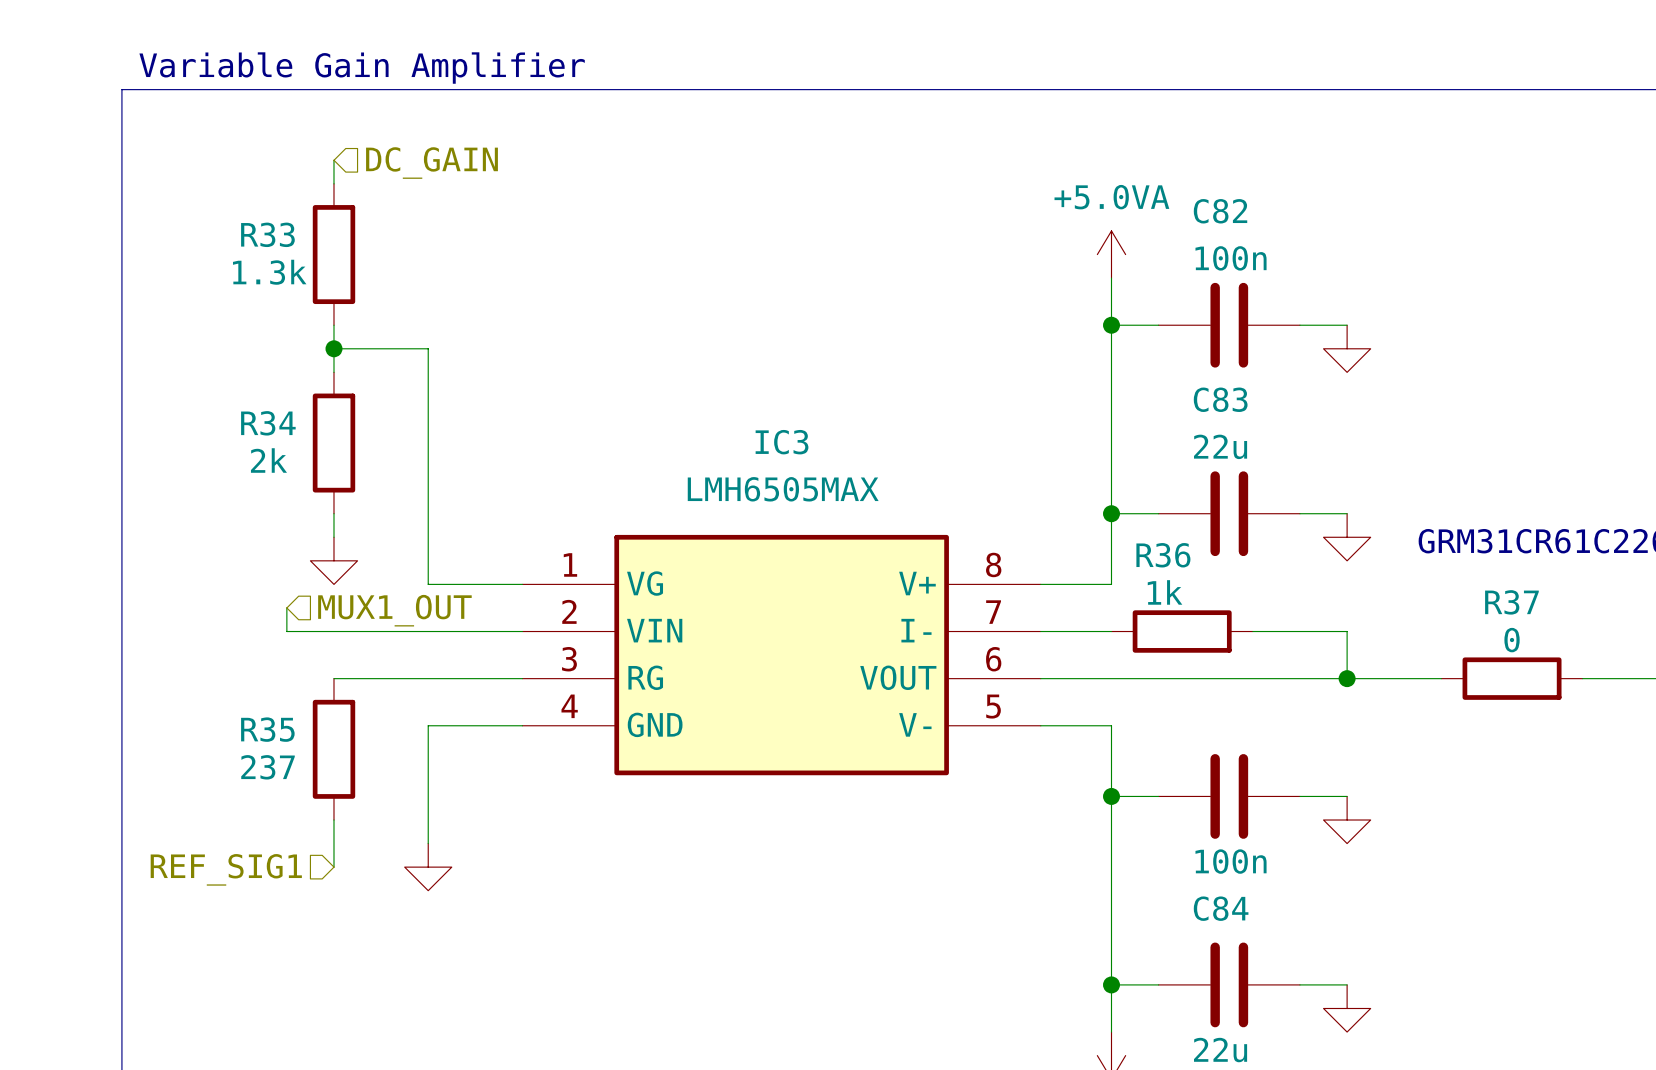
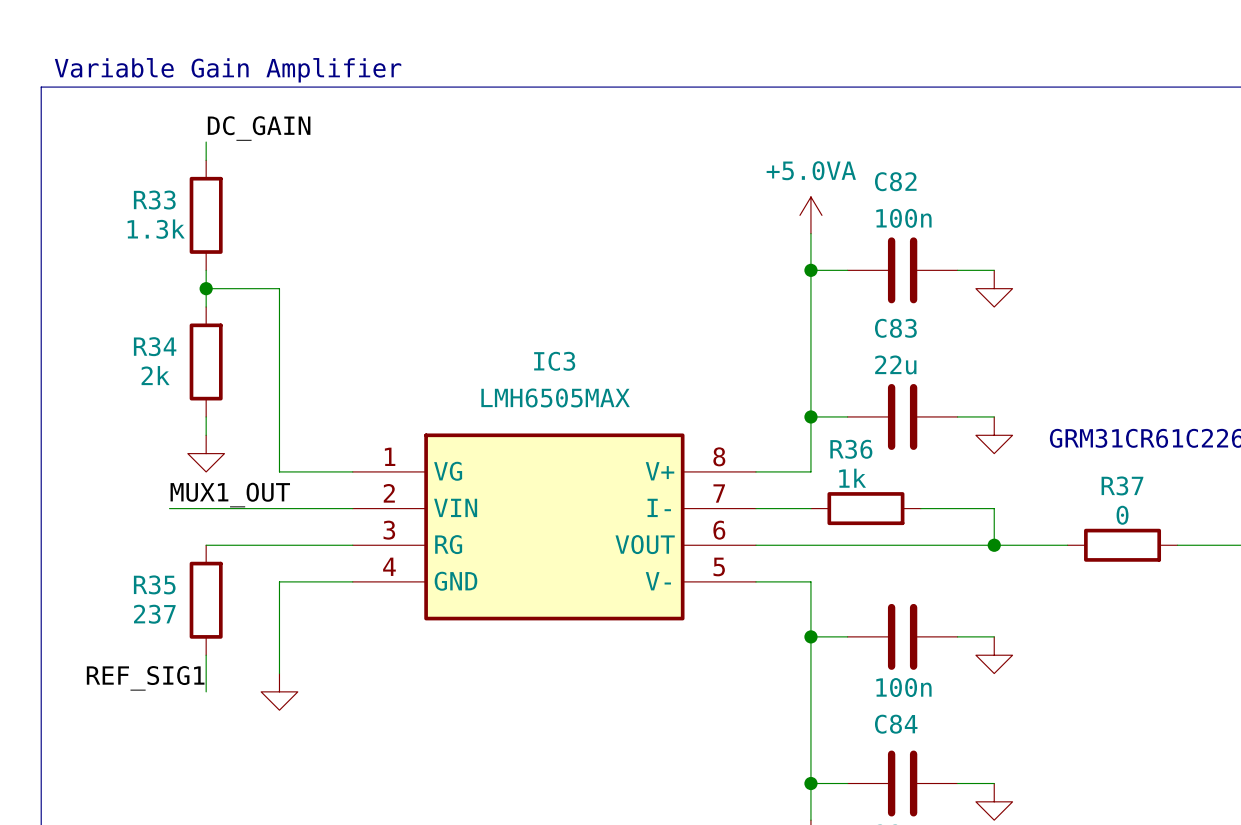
label: none -> DC_GAIN (259, 128)
hierarchical label: DC_GAIN (431, 163) -> none
wire: (286, 607) (286, 631) -> none
hierarchical label: MUX1_OUT (394, 610) -> none
label: none -> MUX1_OUT (230, 495)
label: none -> REF_SIG1 (145, 678)
hierarchical label: REF_SIG1 (226, 869) -> none

